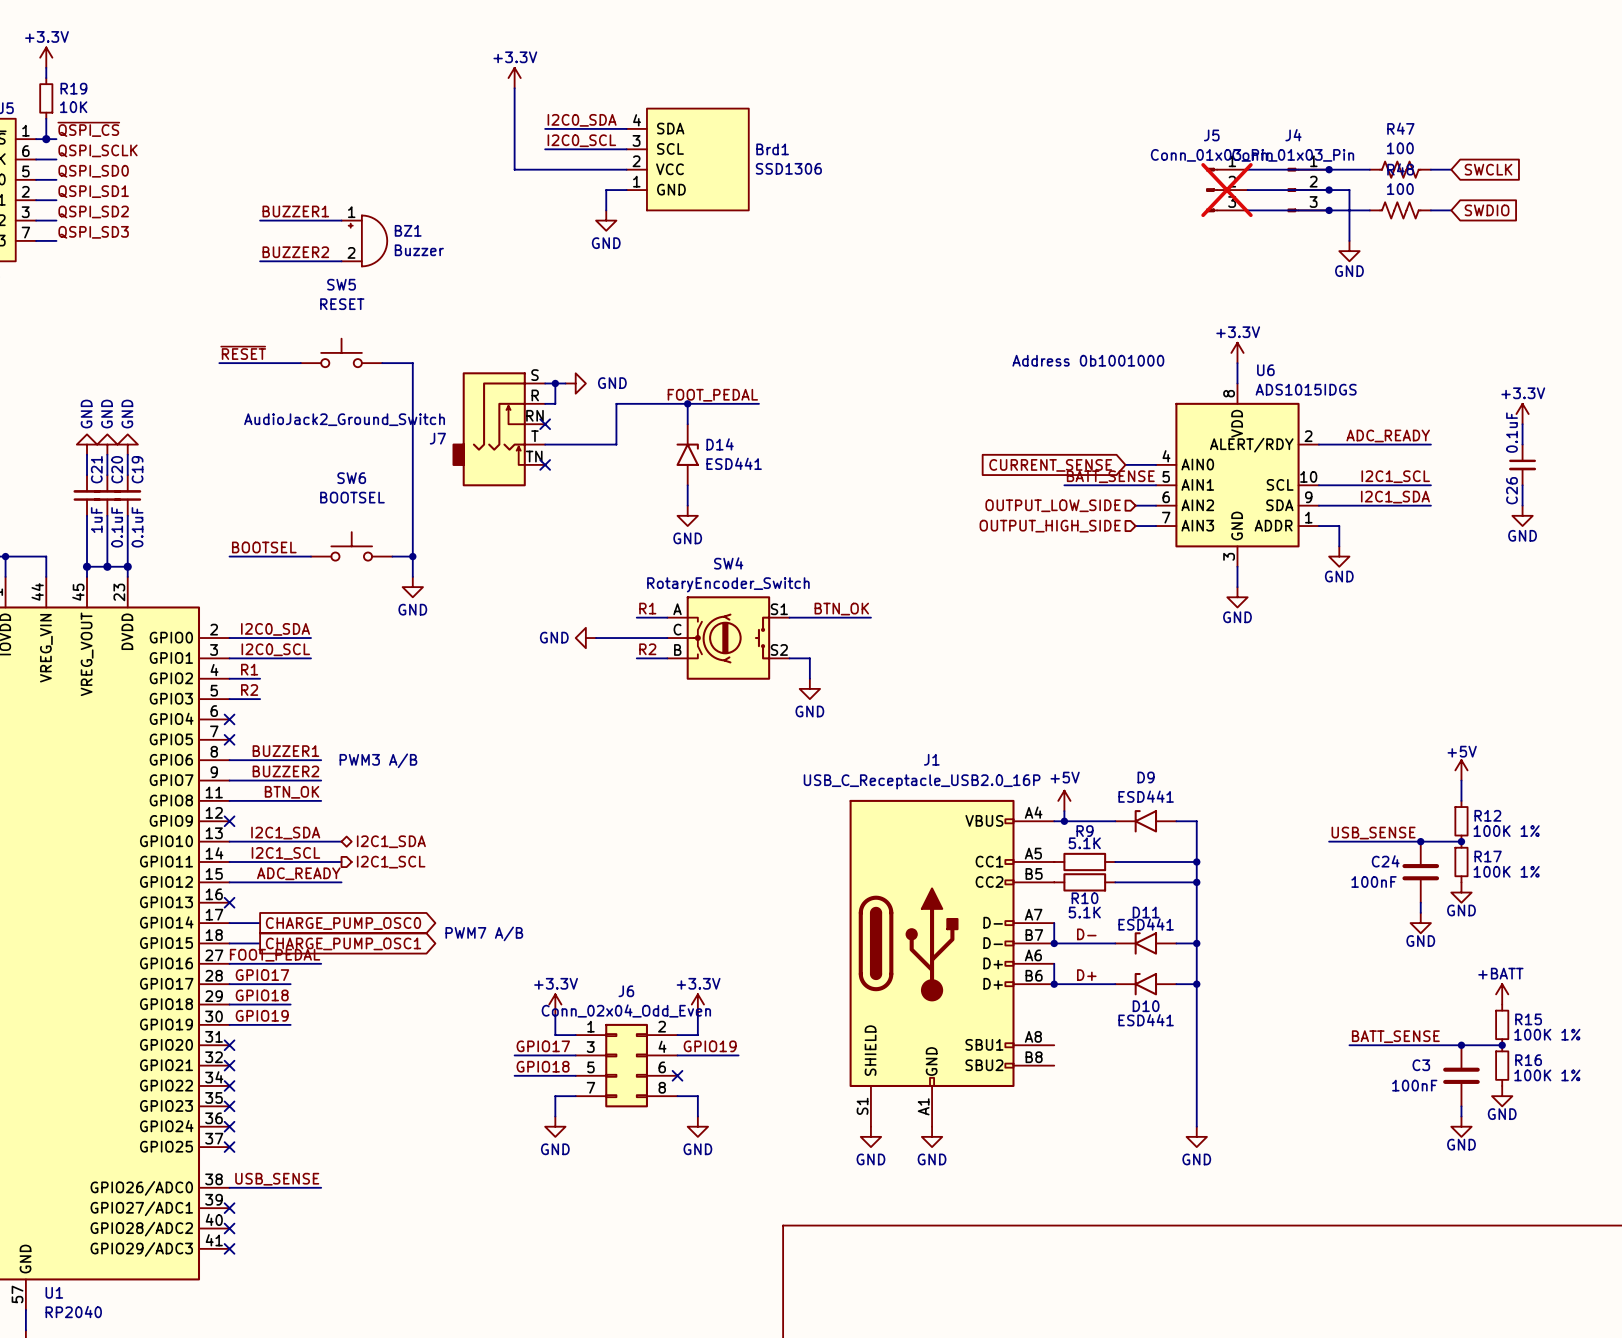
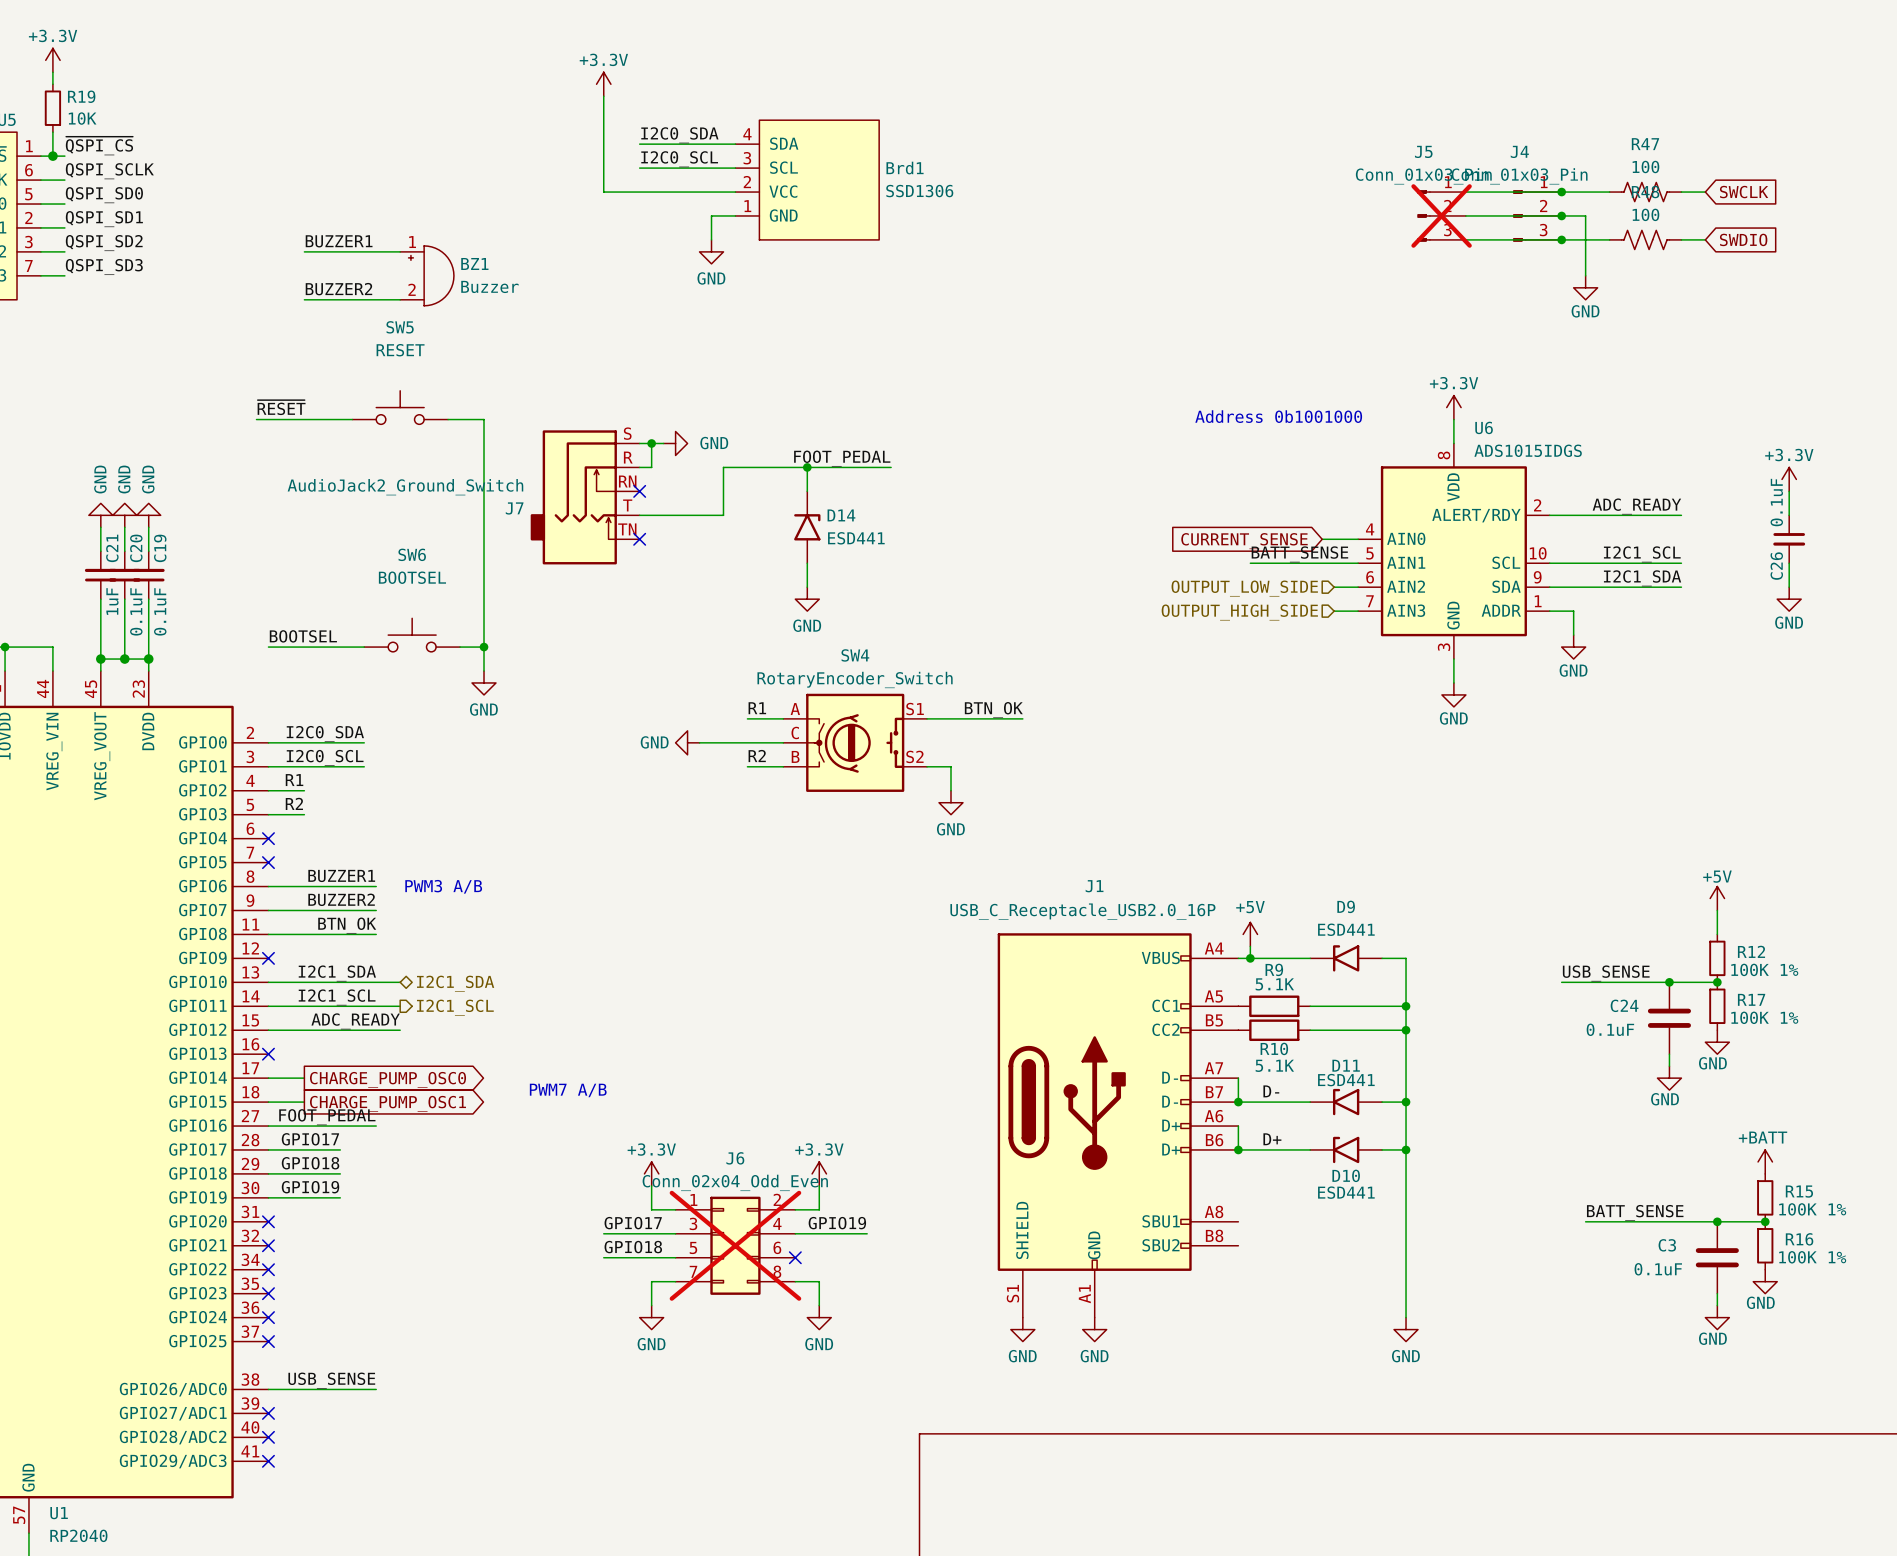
C24 value: 100nF (1374, 881) -> 0.1uF (1610, 1029)
J6 do-not-place cross: none -> (735, 1245)
C3 value: 100nF (1414, 1085) -> 0.1uF (1658, 1269)

